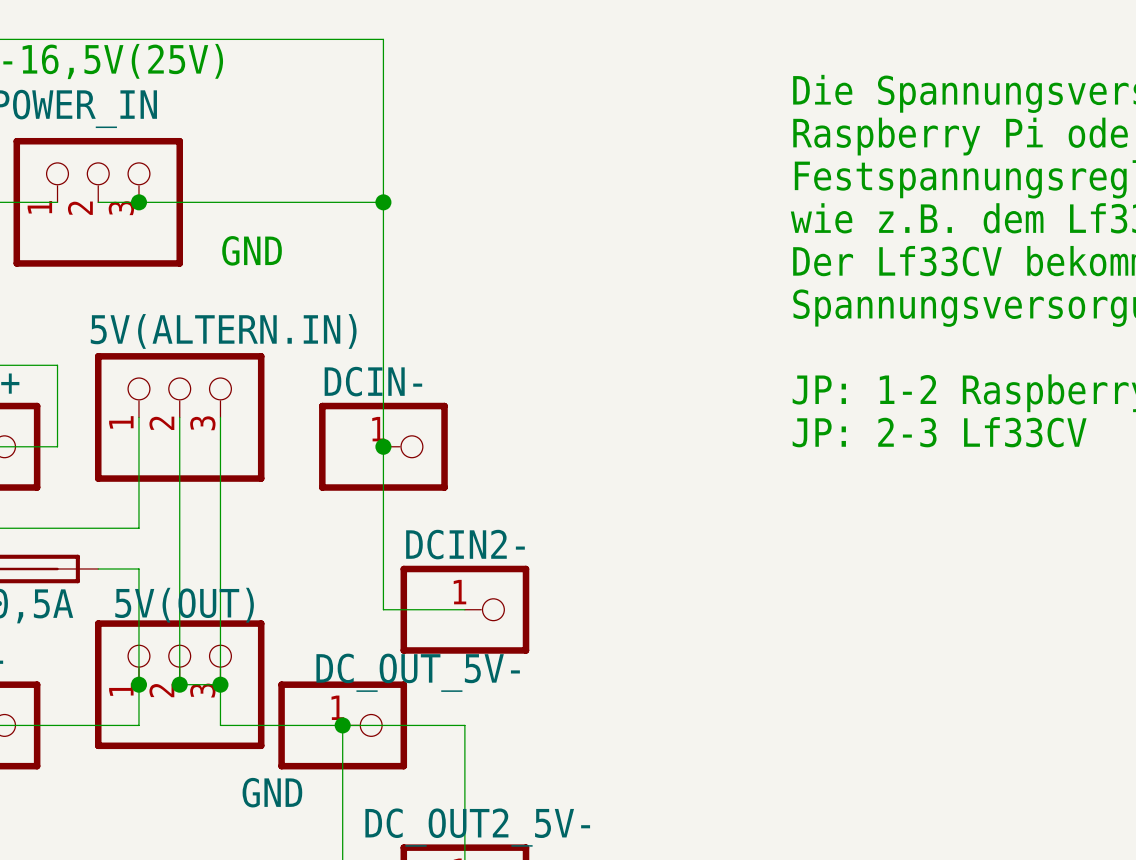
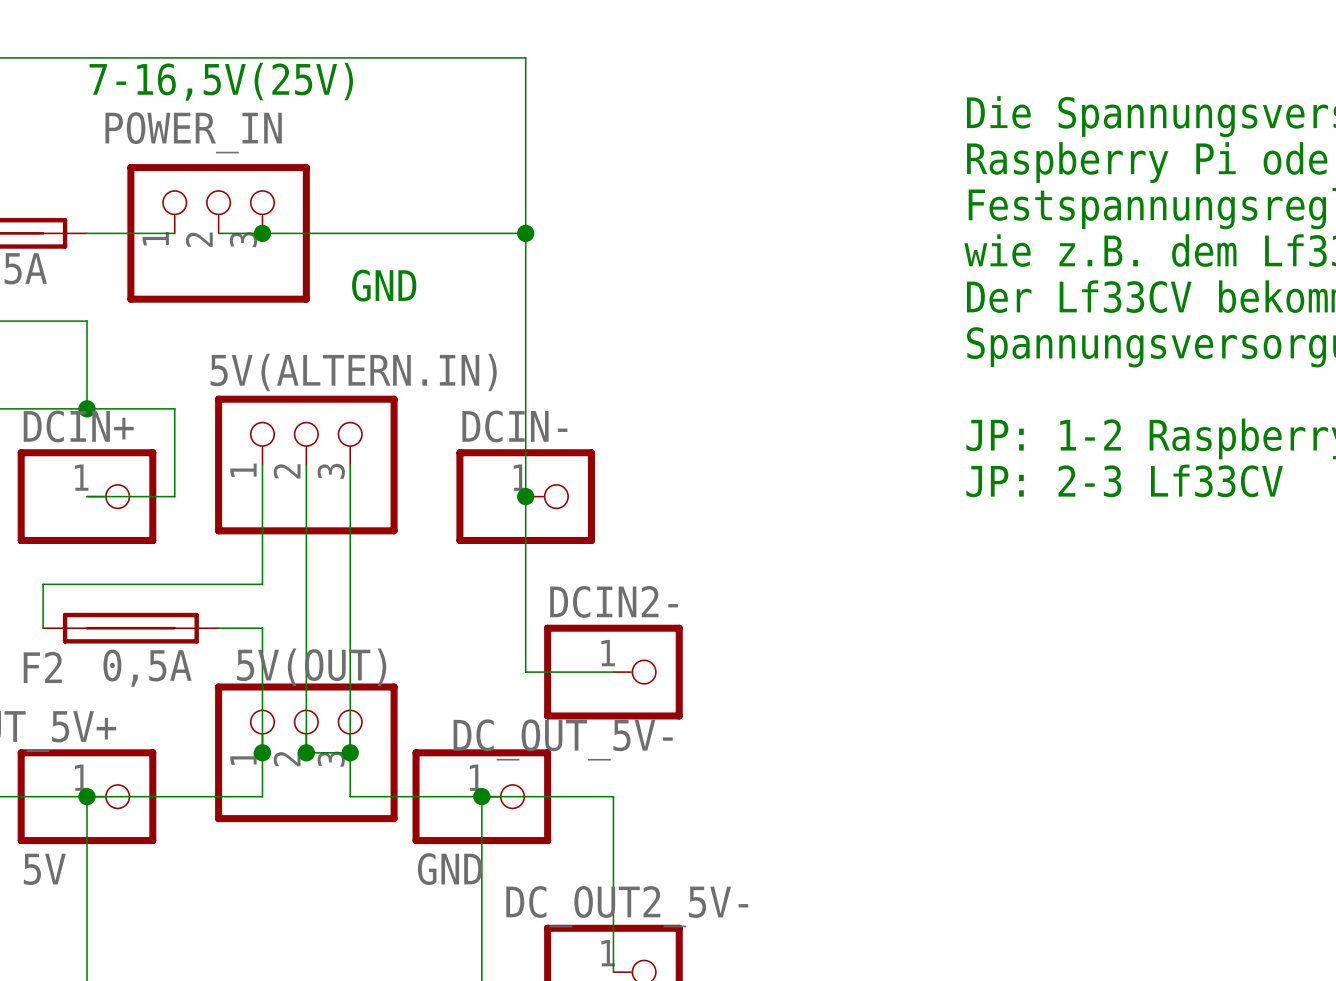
DC_OUT_5V- value position: GND (272, 792) -> GND (450, 869)

